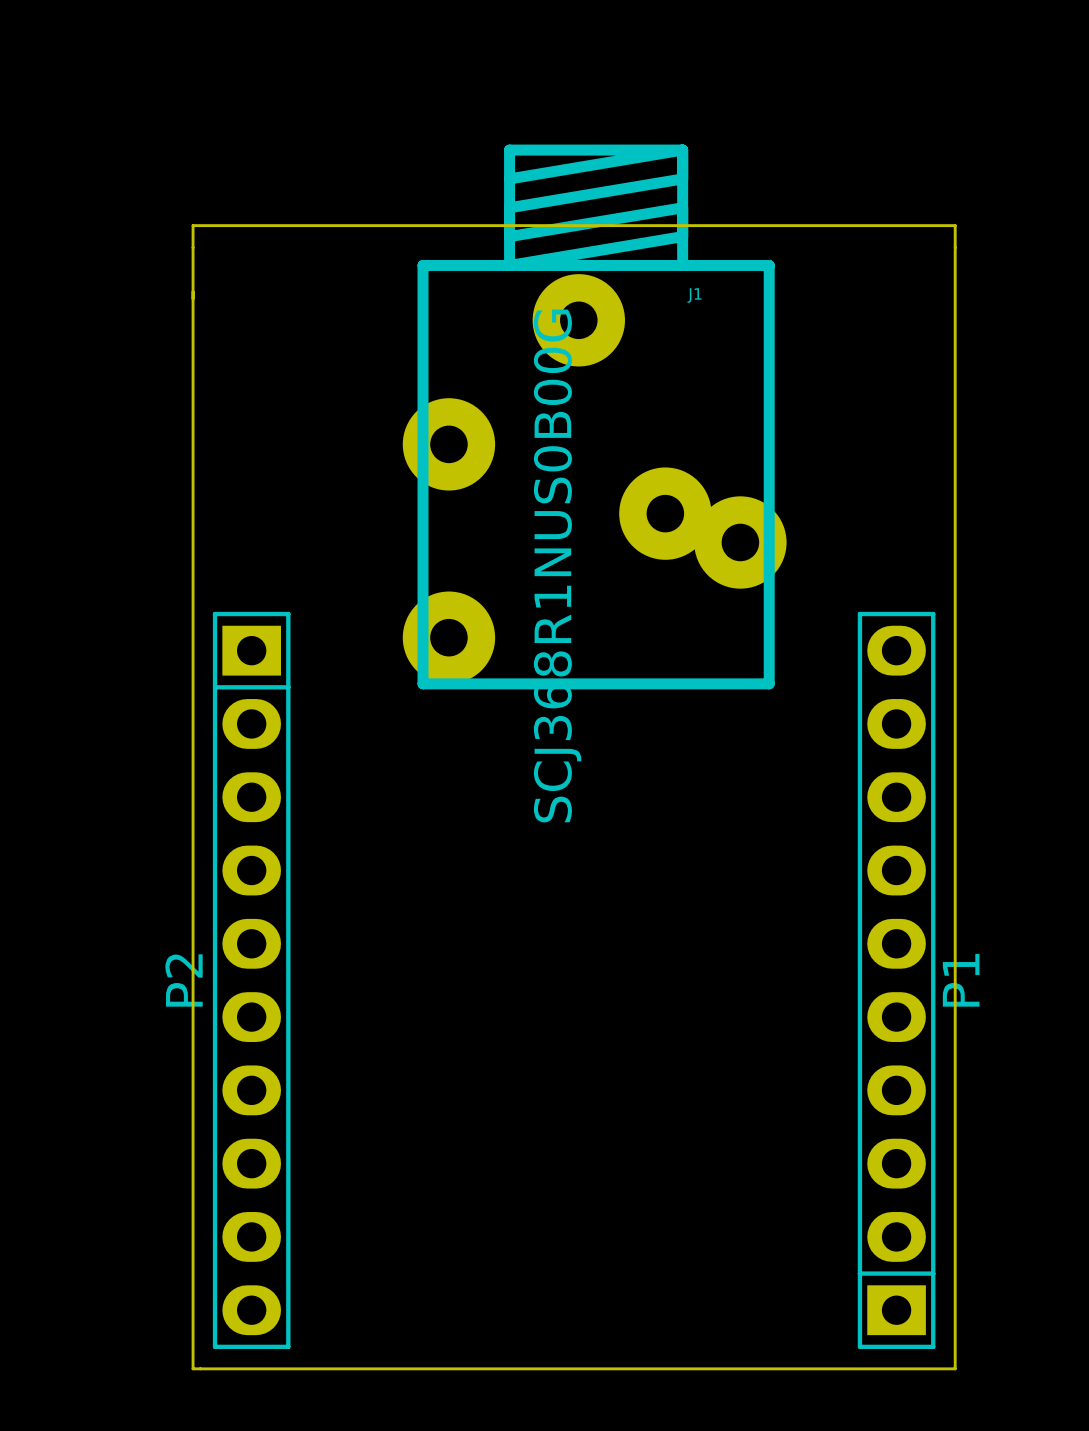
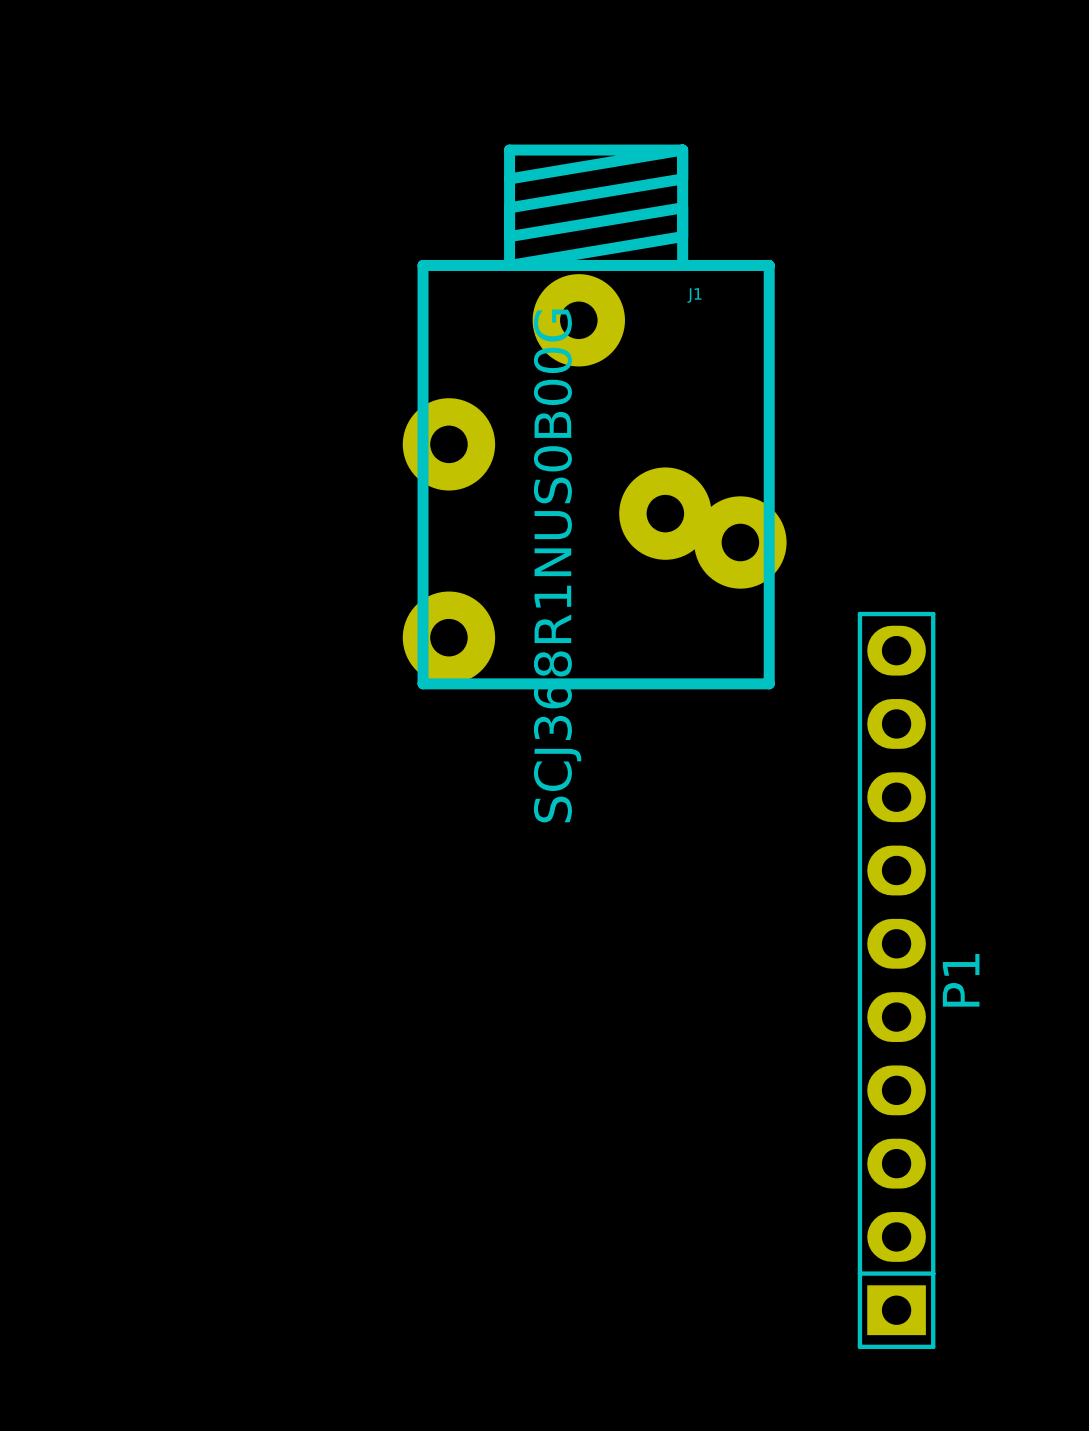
board edge: (193, 225) (193, 1368) (955, 1368) (955, 225) (193, 225) -> none
P2: (251, 980) -> none

